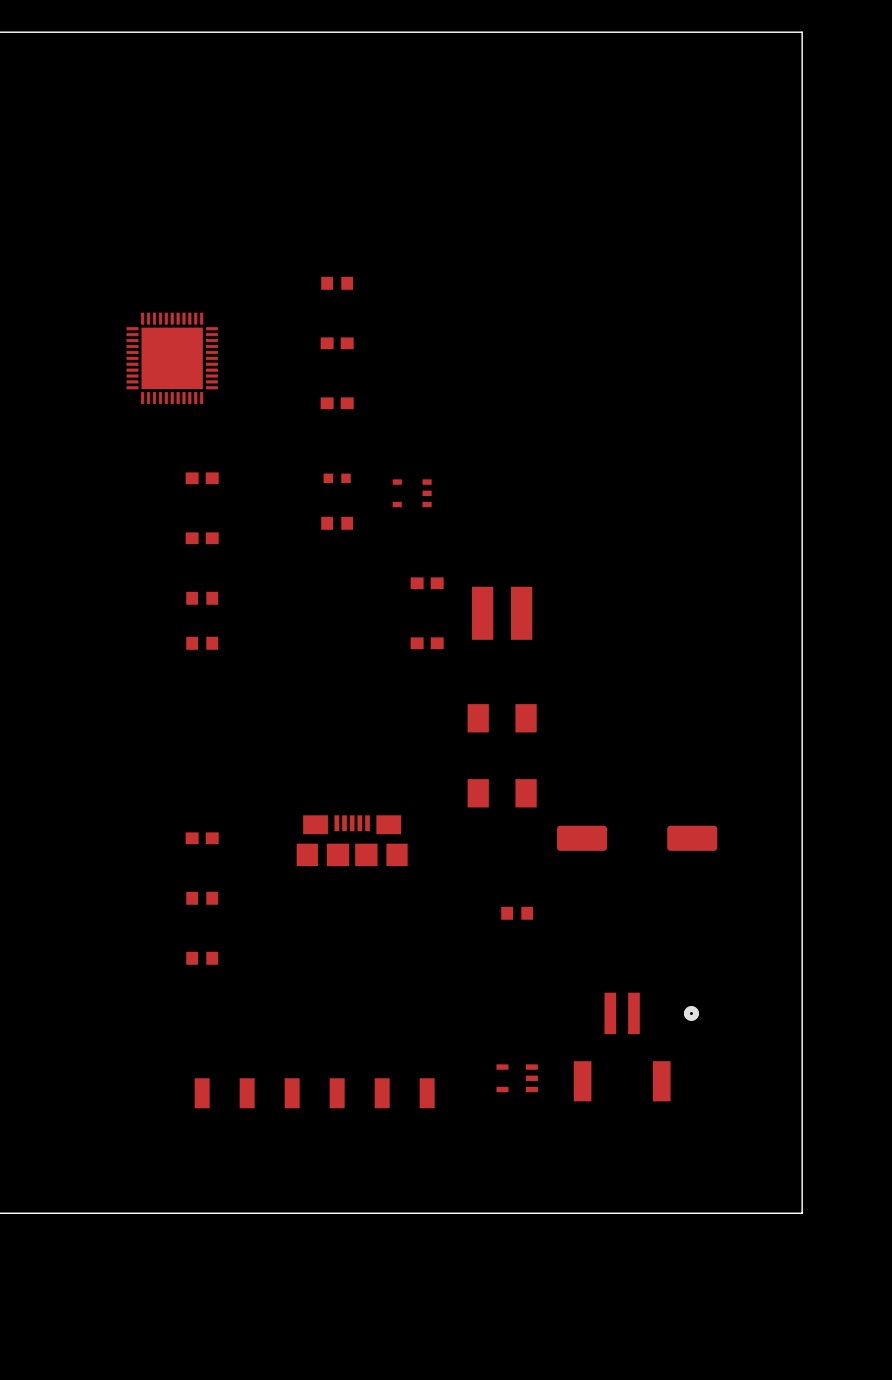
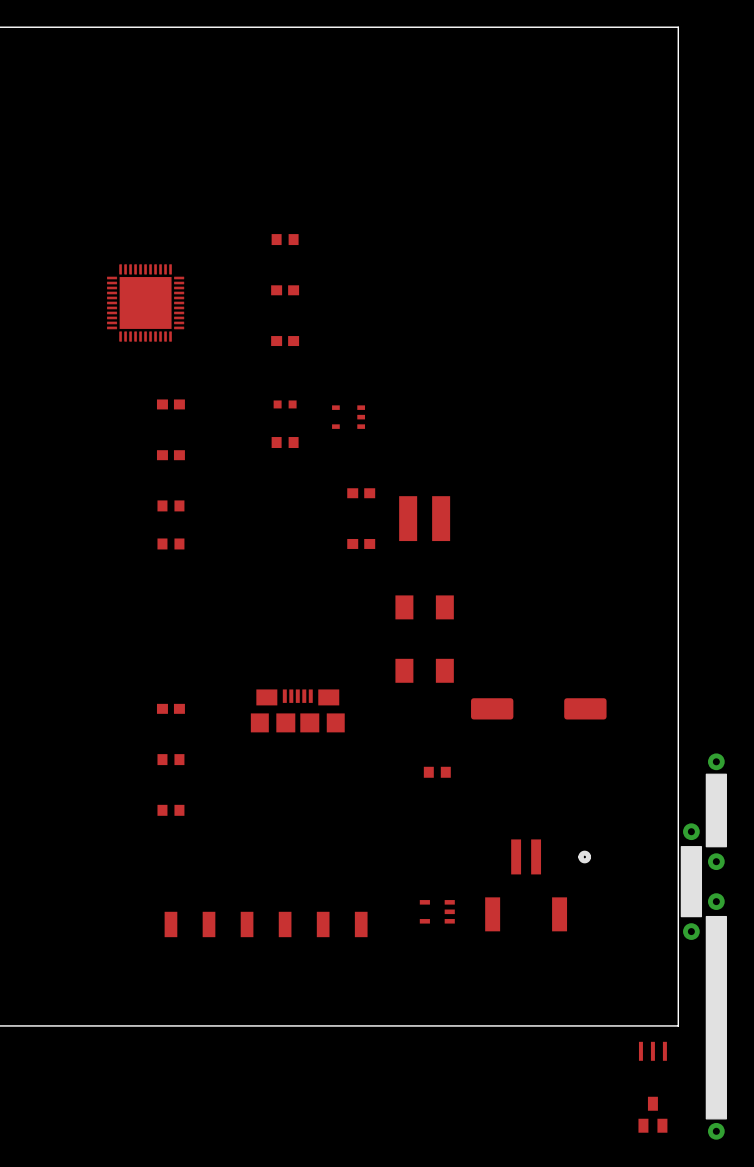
part: none -> (703, 946)
part: none -> (652, 1051)
part: none -> (652, 1114)

